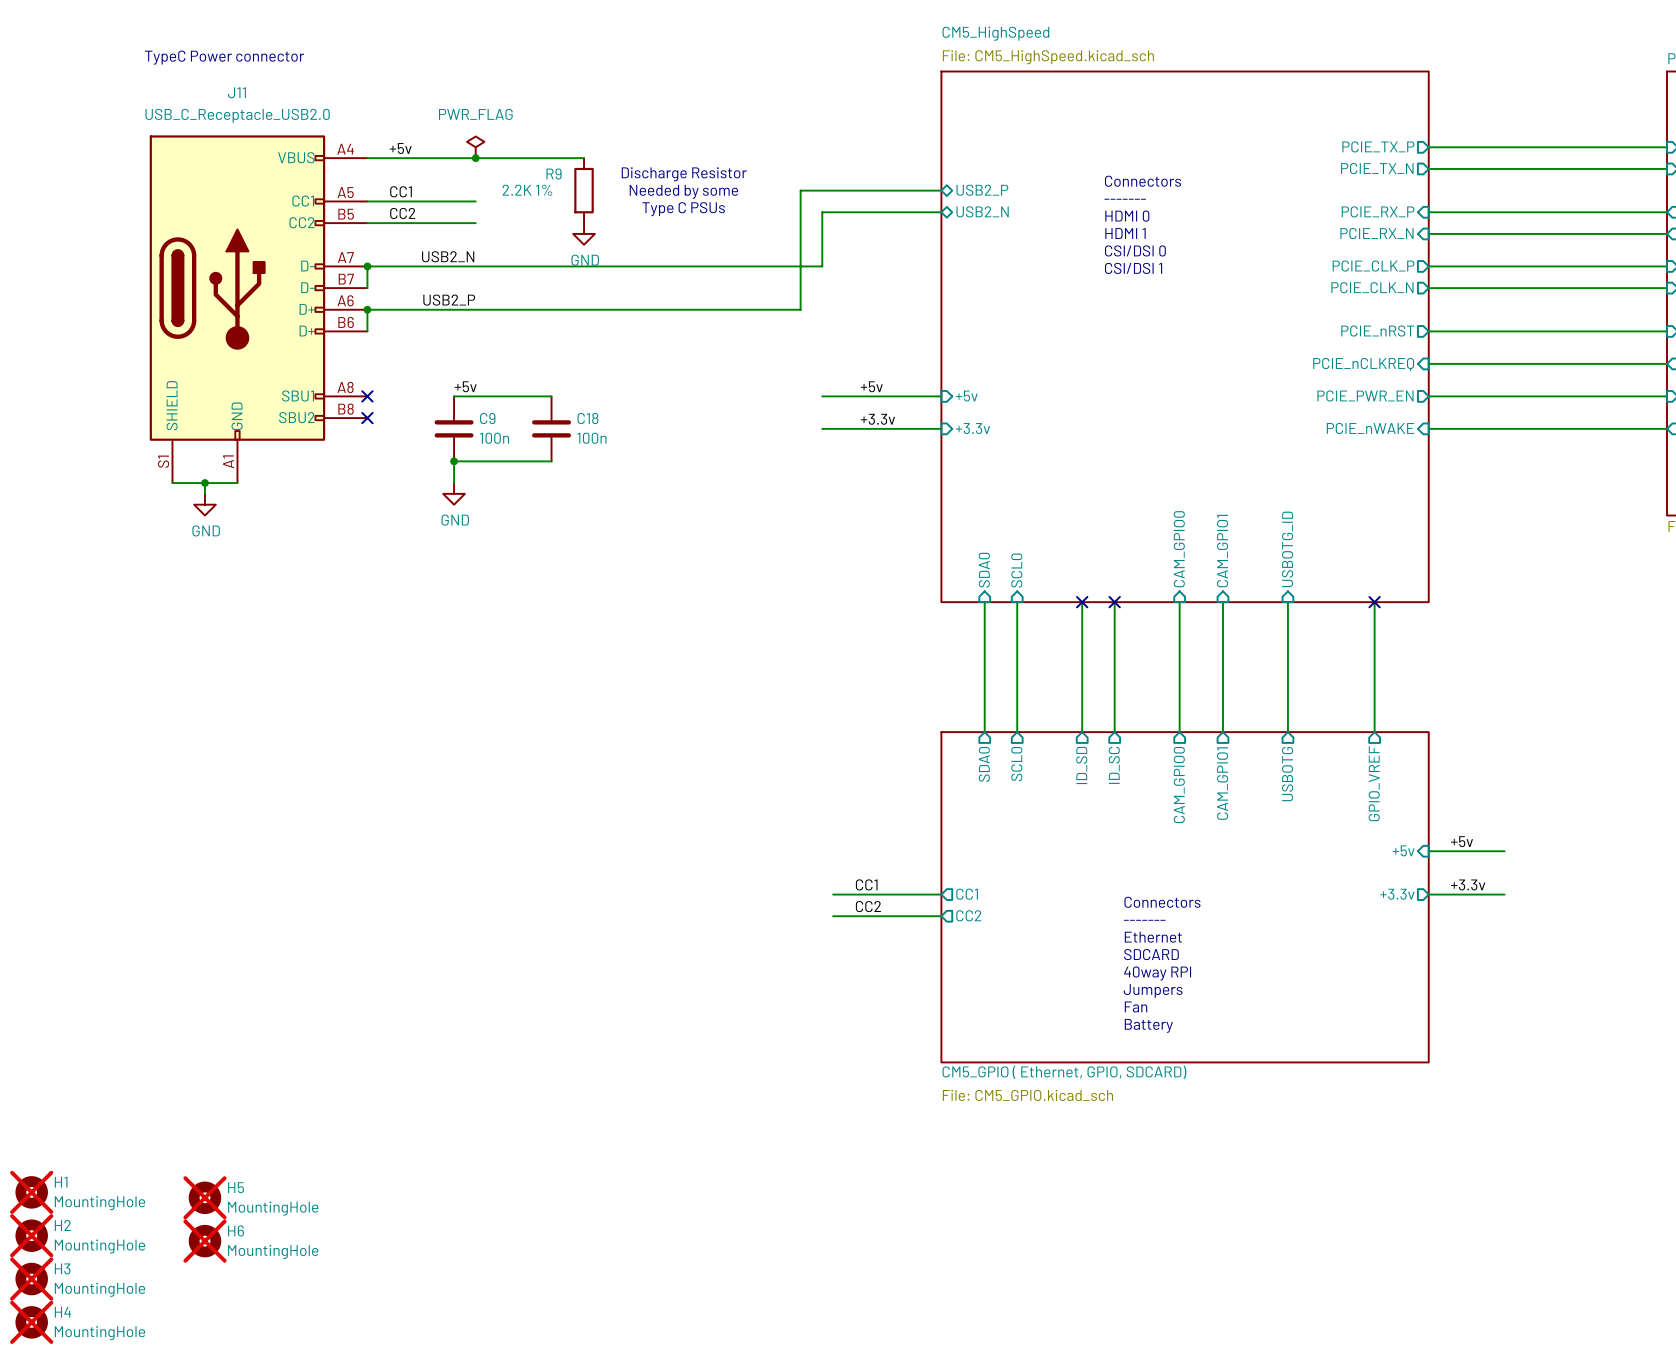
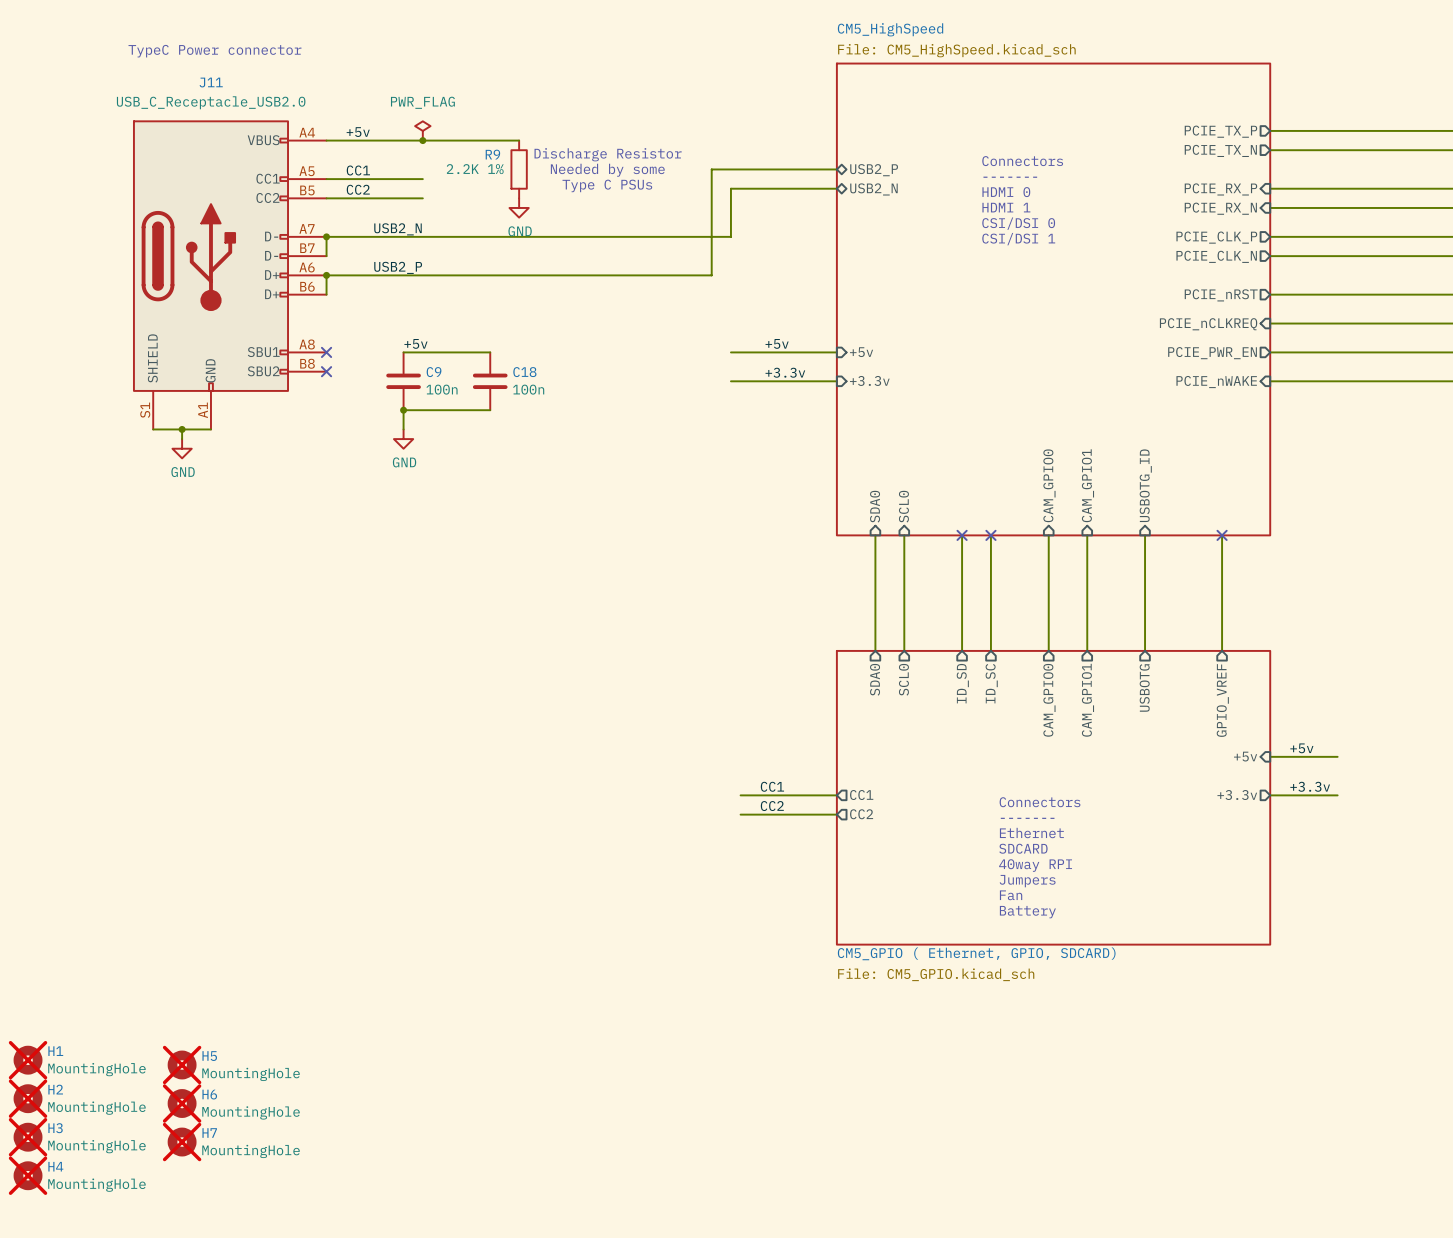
H7: none -> MountingHole (182, 1142)

